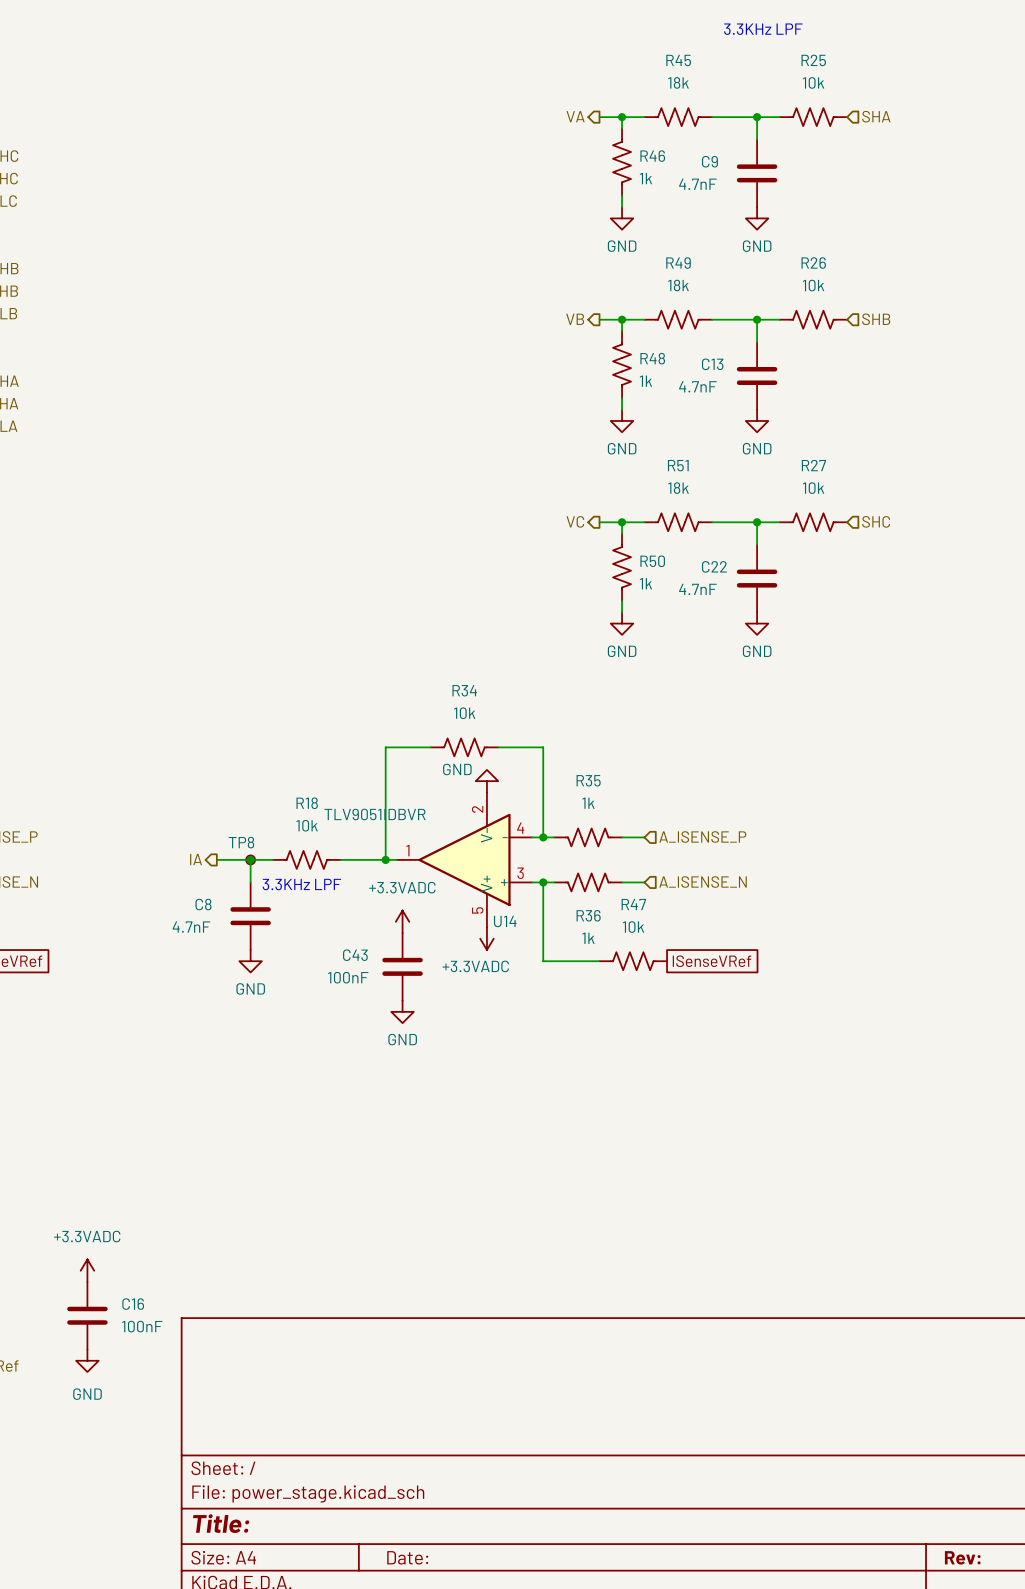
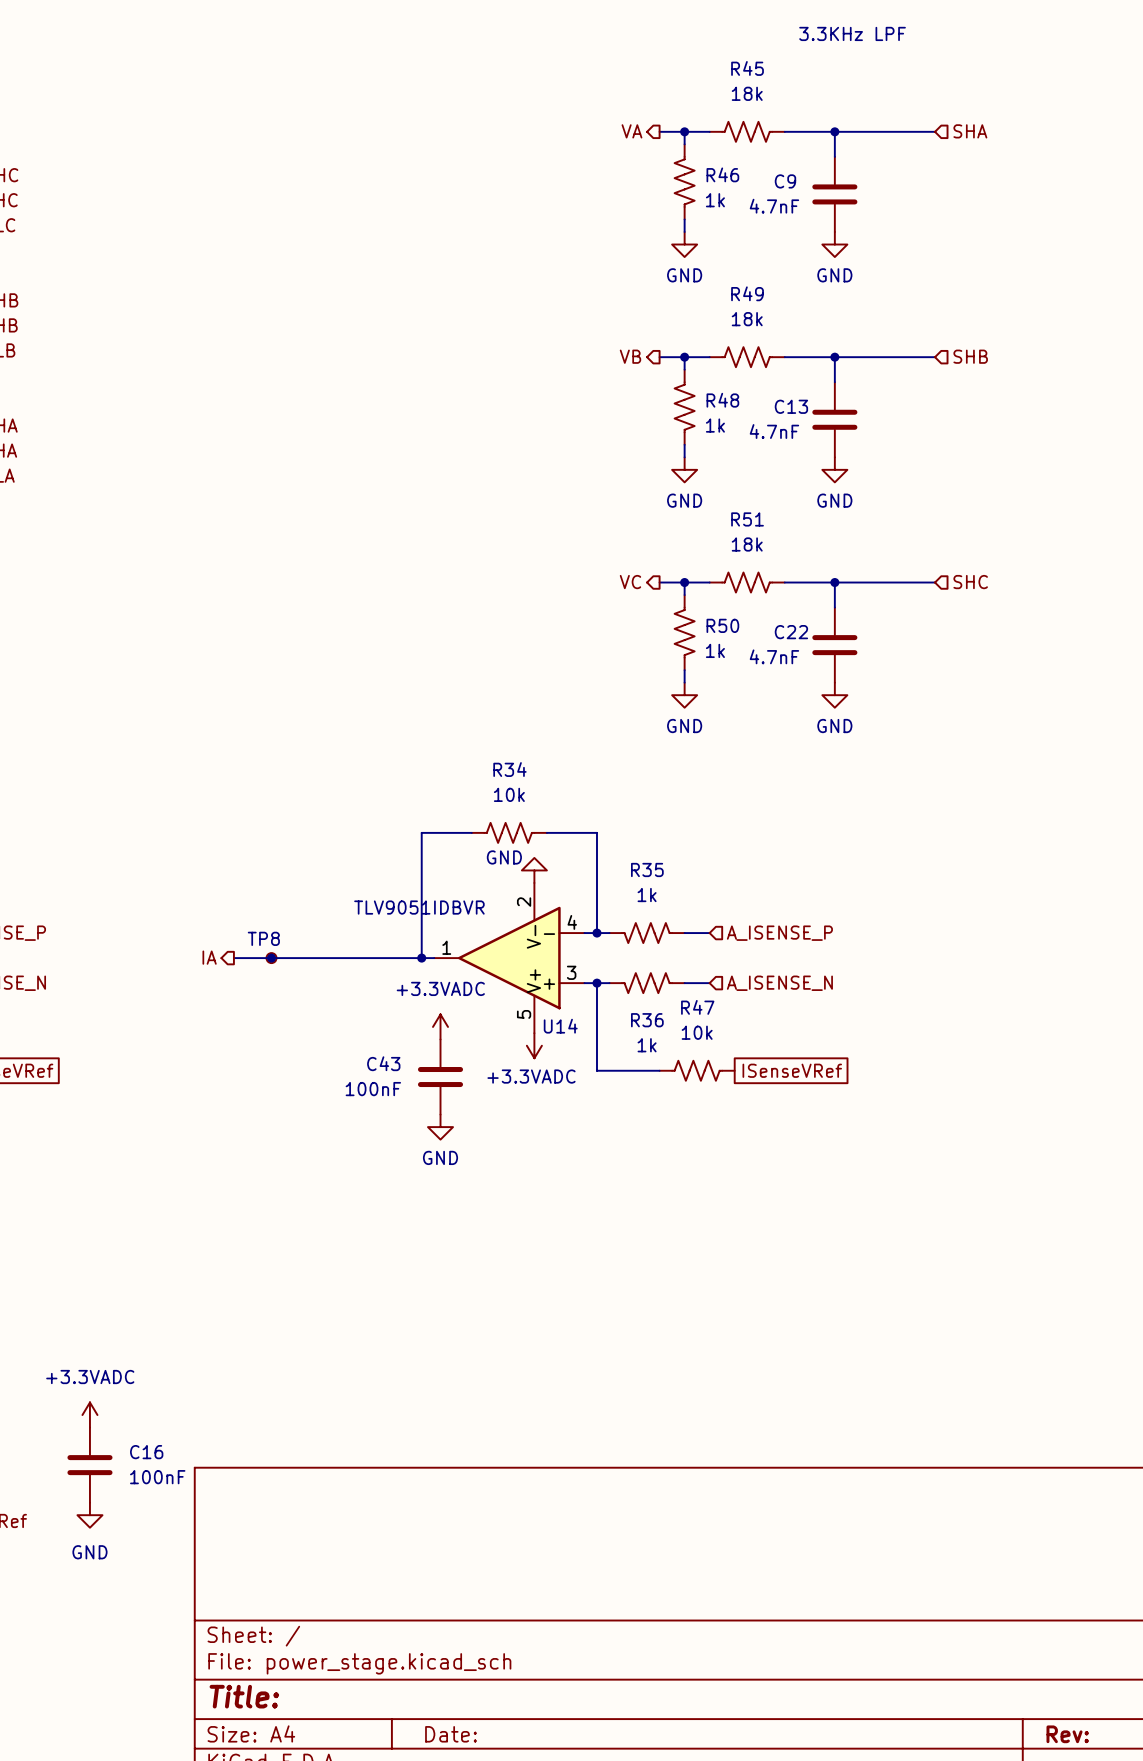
R25: 10k (813, 117) -> none
R26: 10k (813, 319) -> none
R27: 10k (813, 522) -> none
wire: (250, 859) (250, 882) -> none
R18: 10k (306, 859) -> none
text: 3.3KHz LPF (301, 884) -> none
C8: 4.7nF (250, 916) -> none
power symbol: GND (250, 961) -> none

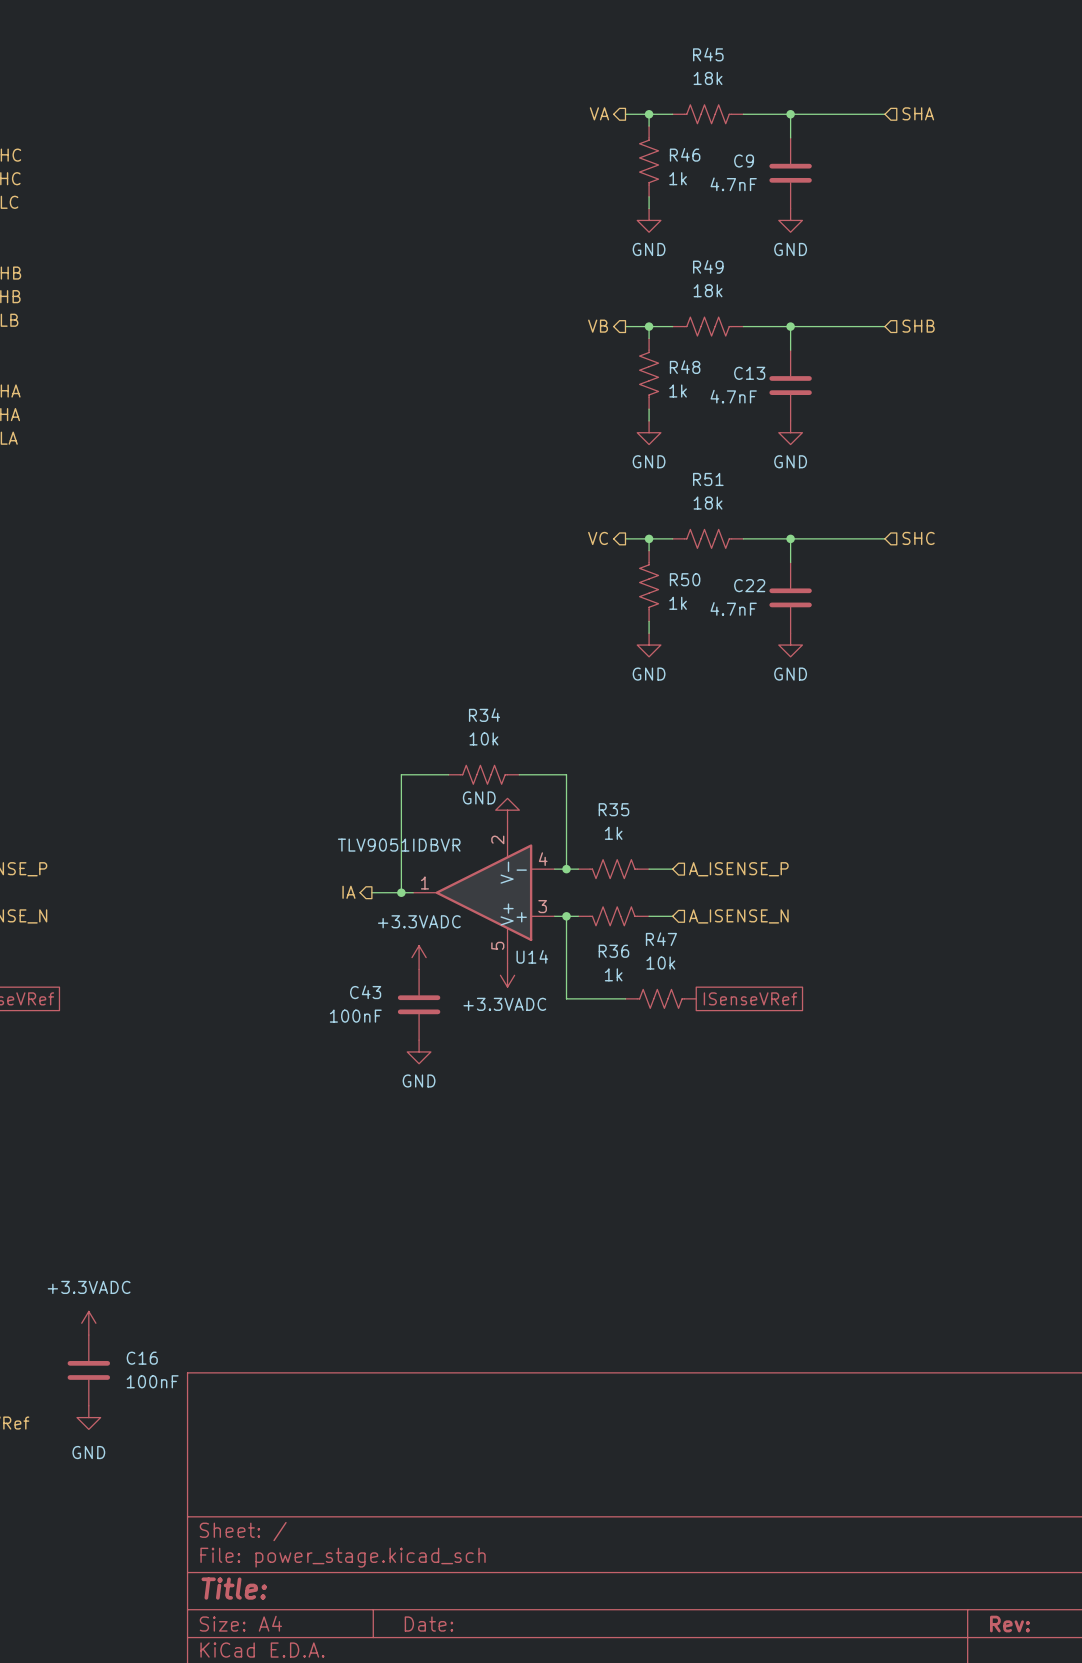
text: 3.3KHz LPF (852, 33) -> none
hierarchical label position: IA (209, 957) -> IA (348, 892)
wire: (233, 958) (390, 958) -> none
junction: (271, 958) -> none
TP8: (271, 958) -> none

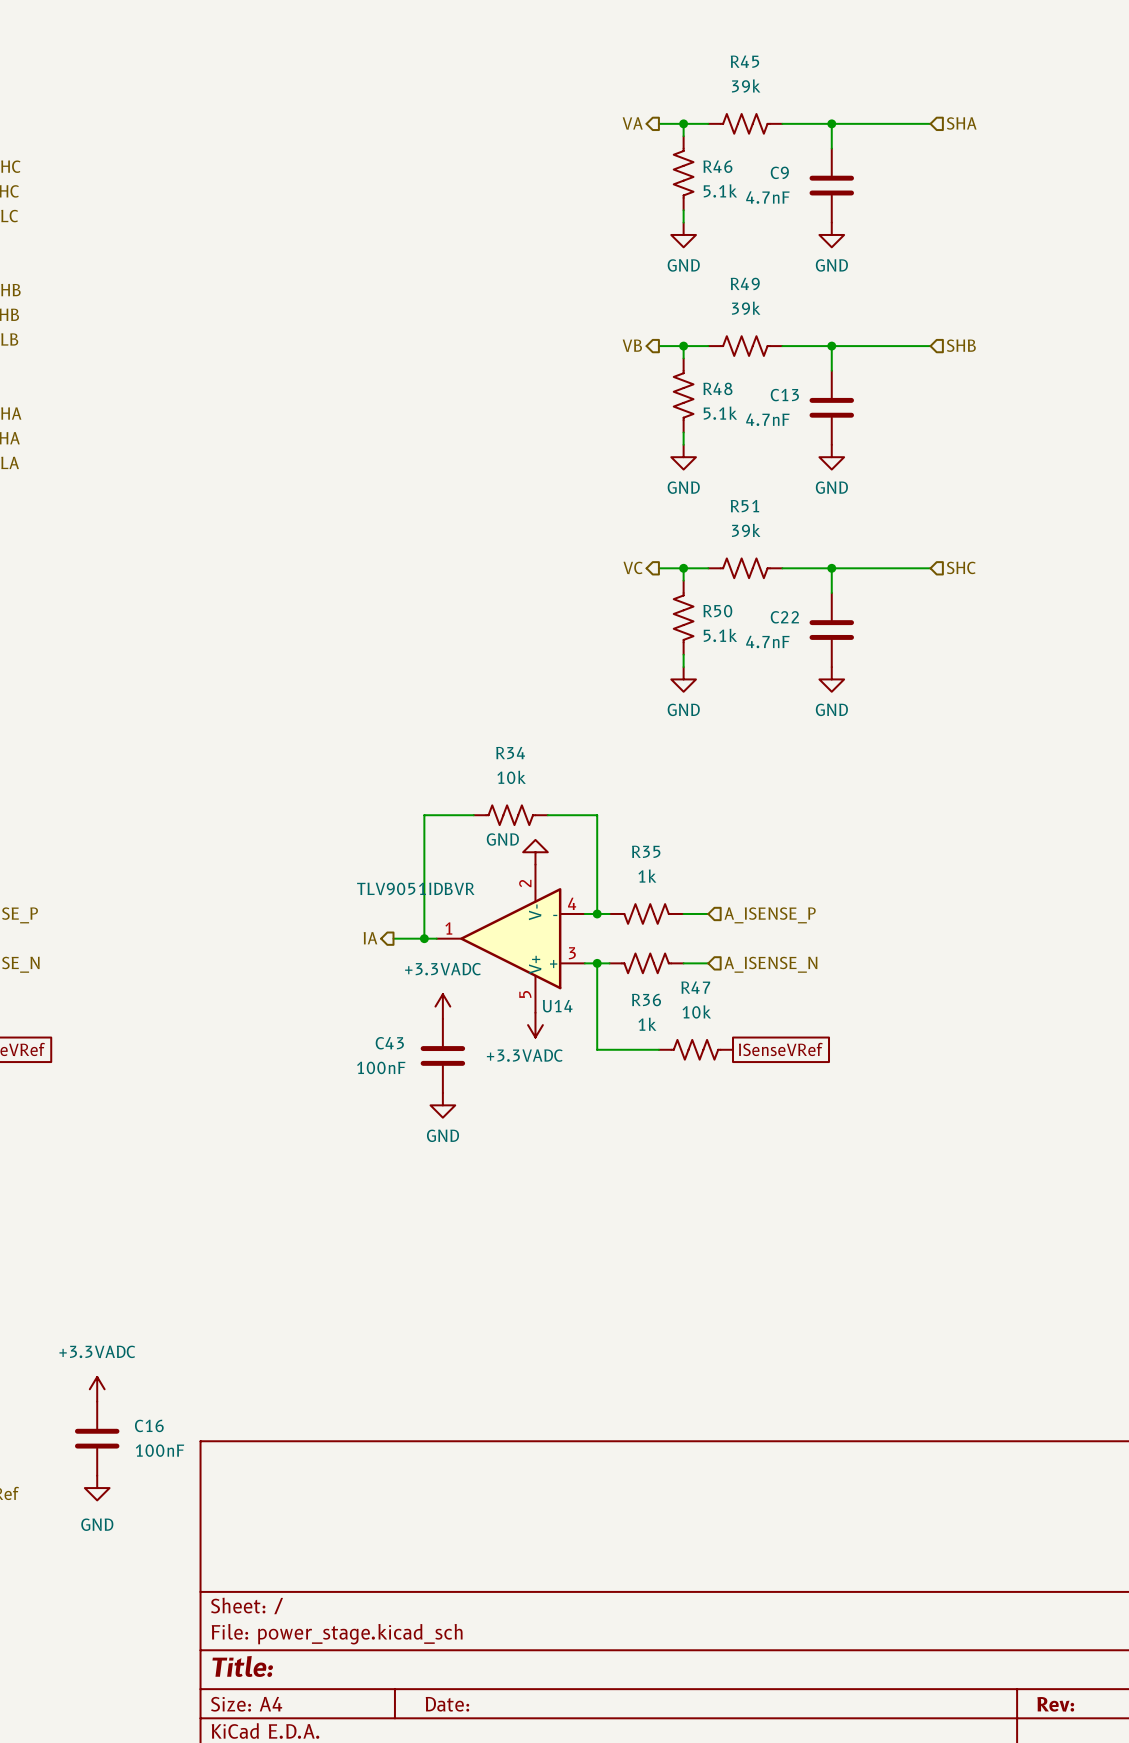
R45 value: 18k (708, 78) -> 39k (746, 86)
R46 value: 1k (678, 178) -> 5.1k (720, 190)
R49 value: 18k (708, 290) -> 39k (746, 308)
R48 value: 1k (678, 391) -> 5.1k (720, 413)
R51 value: 18k (708, 503) -> 39k (746, 530)
R50 value: 1k (678, 603) -> 5.1k (720, 635)

